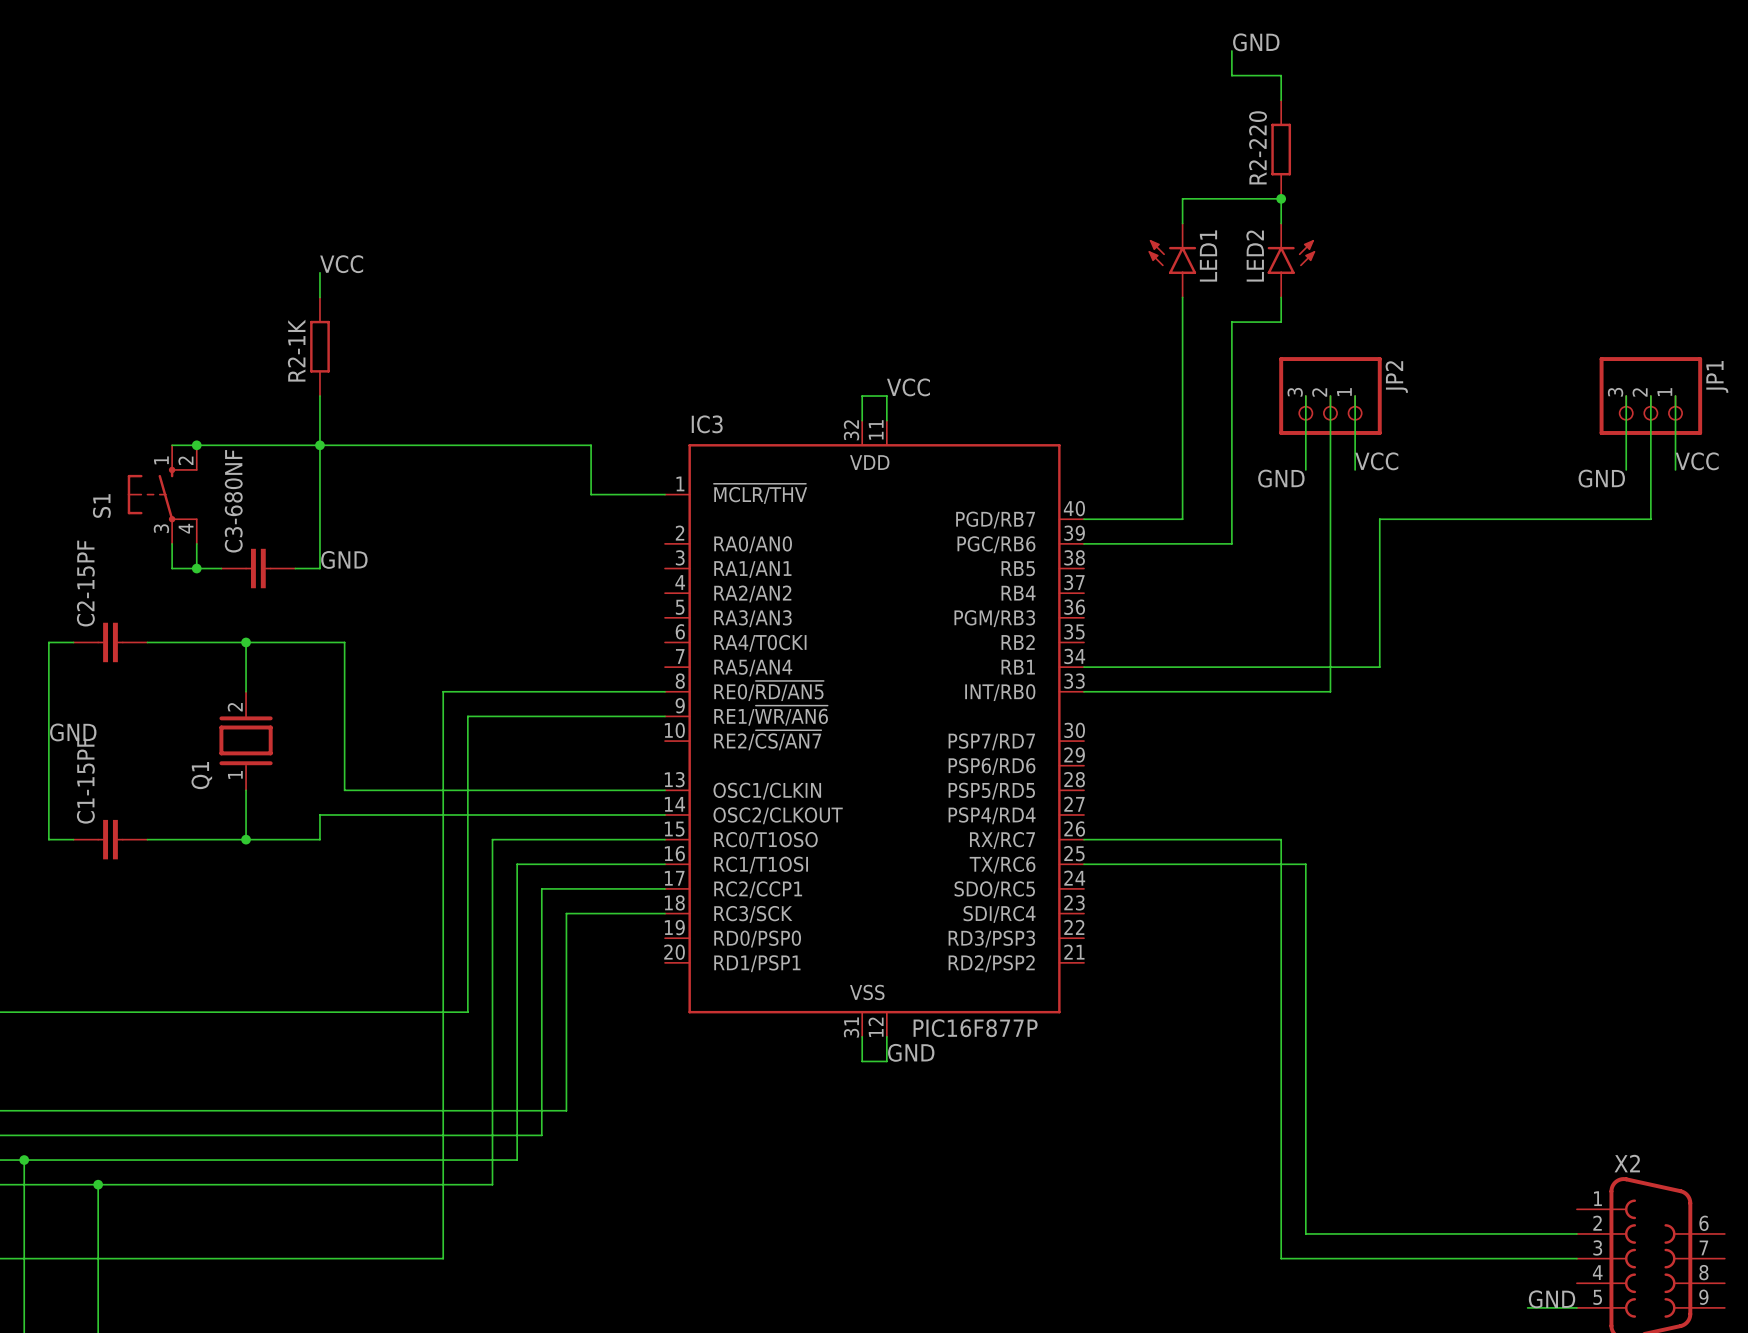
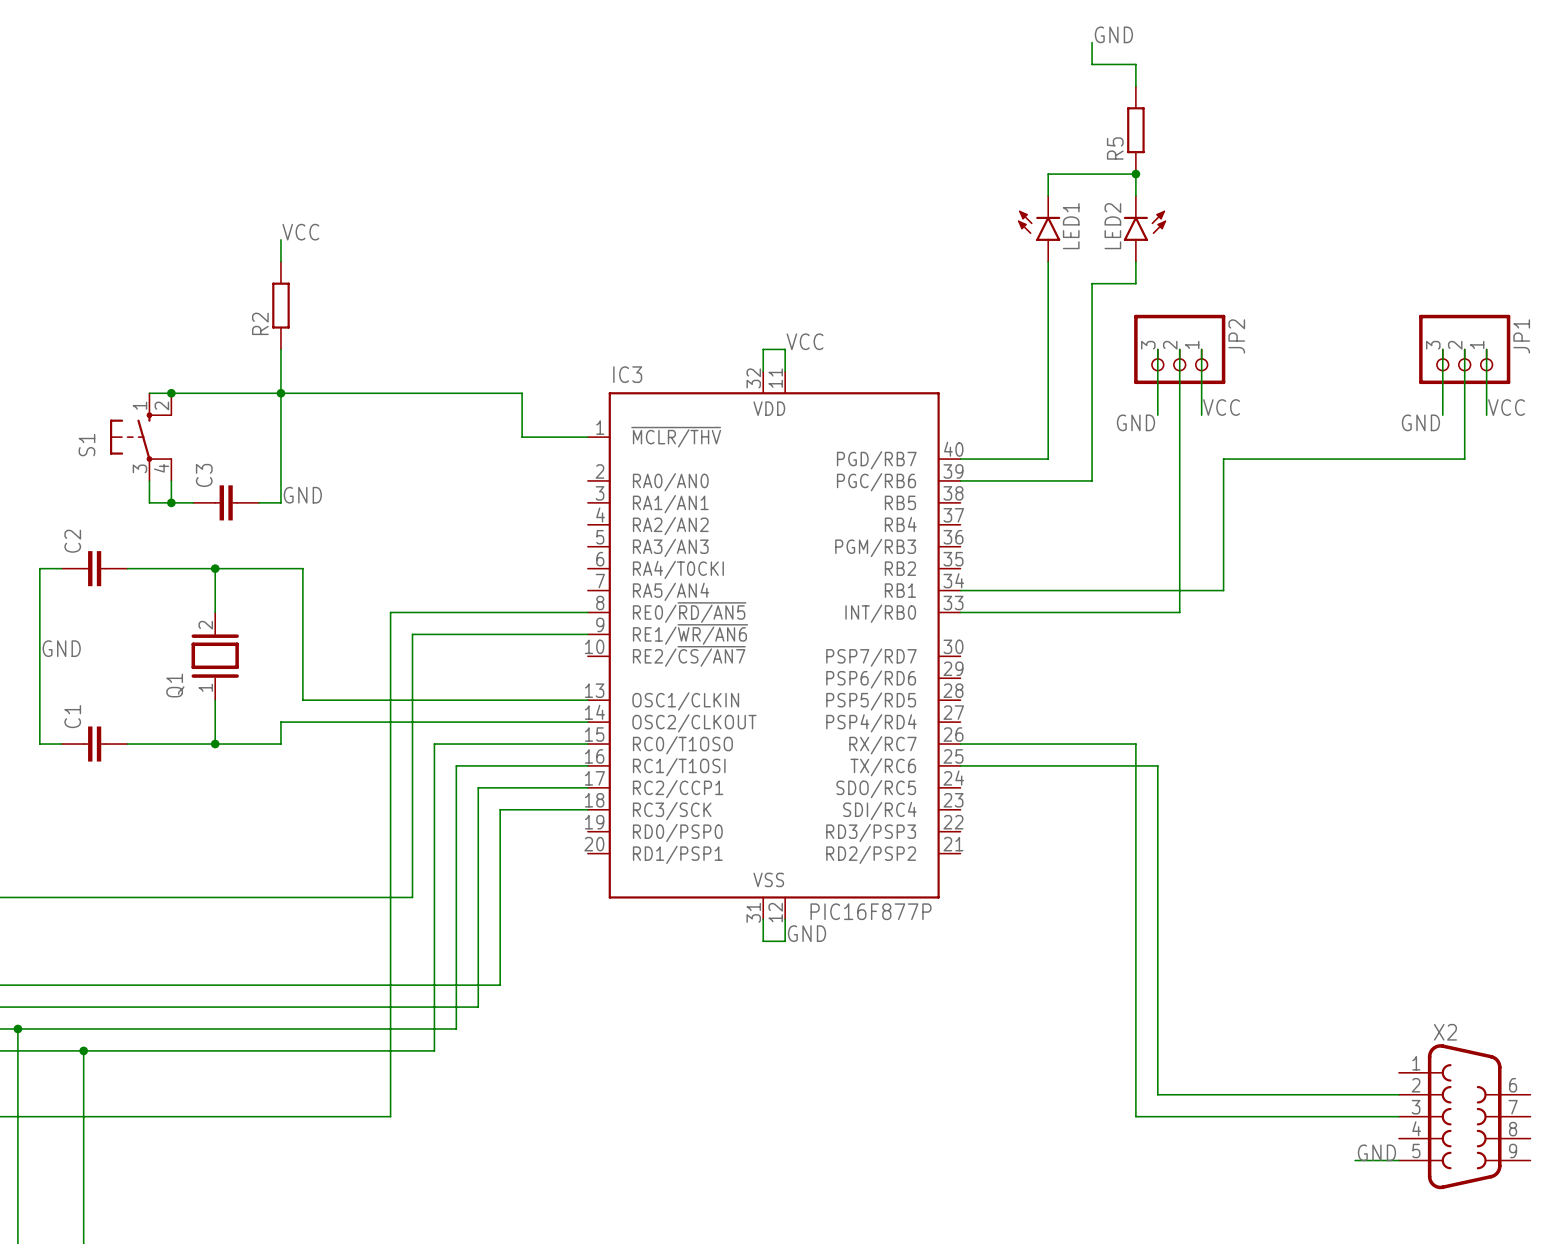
R2-220 name: R2-220 (1258, 147) -> R5 (1115, 148)
R2-1K name: R2-1K (296, 350) -> R2 (260, 323)
C3-680NF name: C3-680NF (233, 501) -> C3 (204, 475)
C2-15PF name: C2-15PF (85, 583) -> C2 (72, 541)
C1-15PF name: C1-15PF (85, 780) -> C1 (72, 716)

